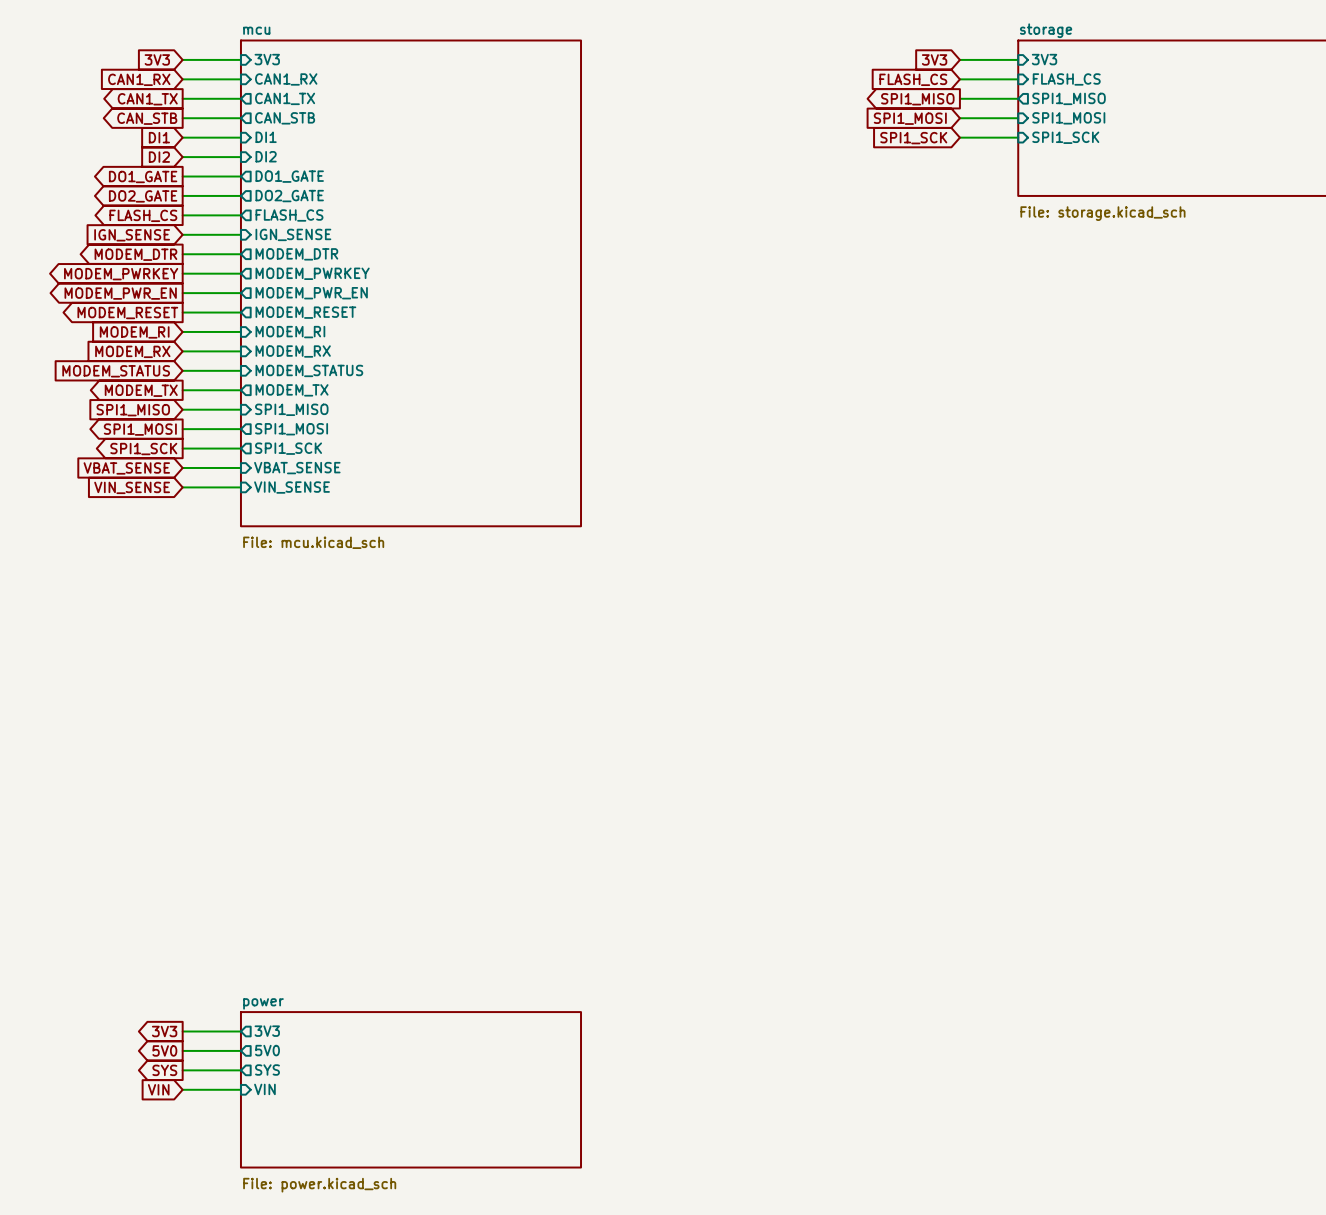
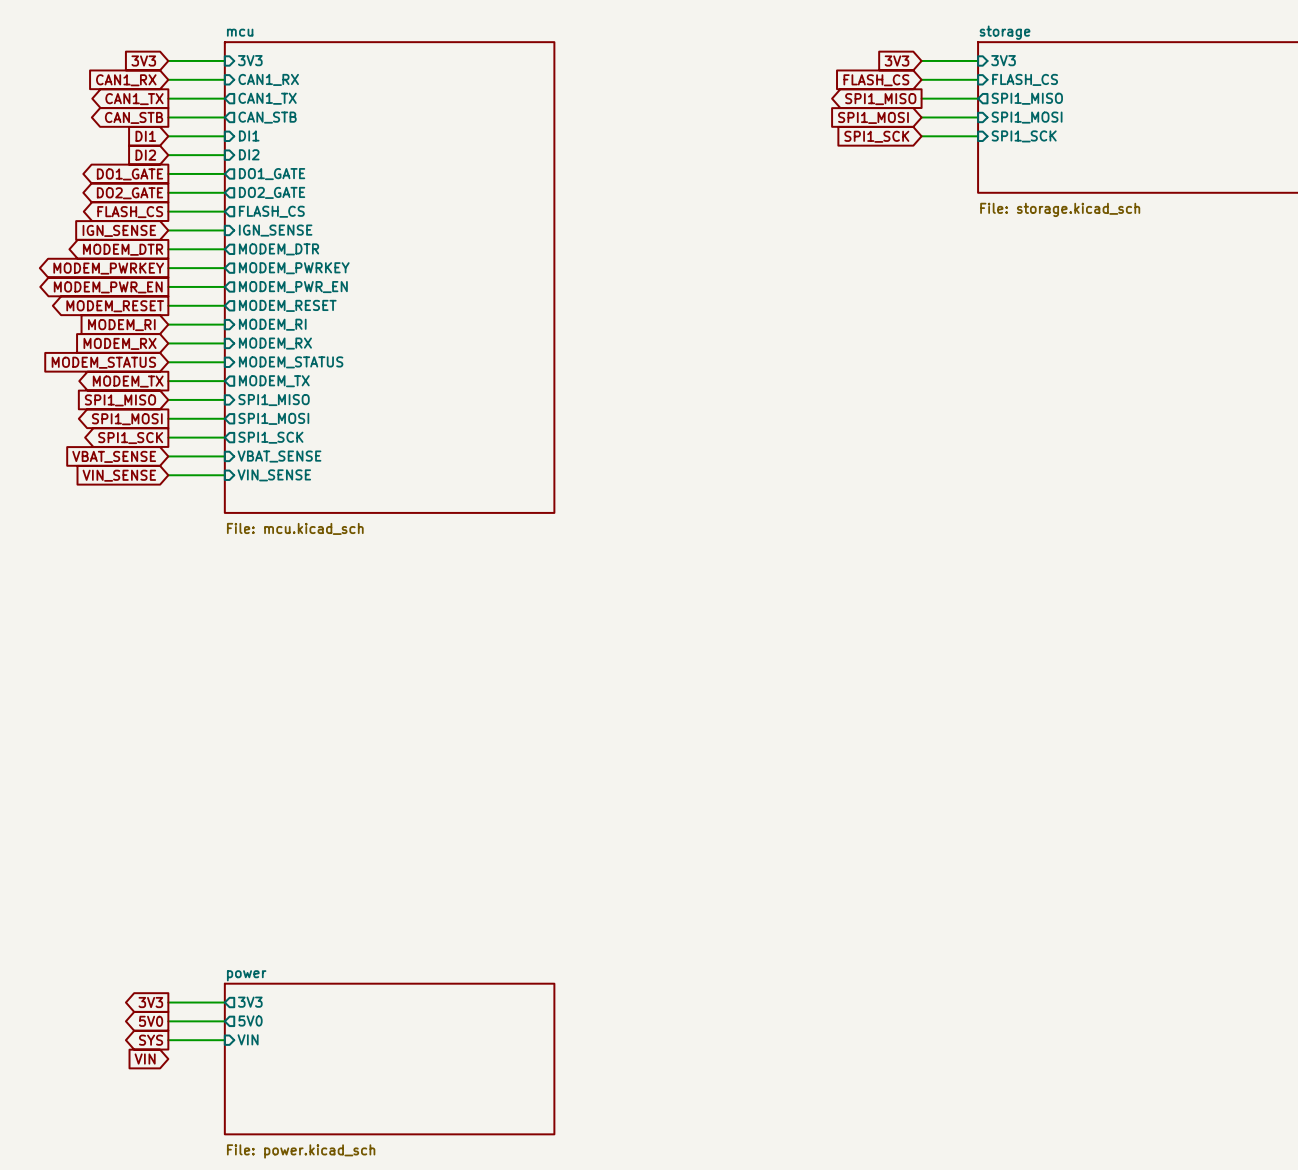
sheet pin shape: output (267, 1070) -> input (248, 1039)
sheet pin: SYS (267, 1070) -> VIN (248, 1039)
wire: (182, 1089) (240, 1089) -> none
sheet pin: VIN (264, 1089) -> none

